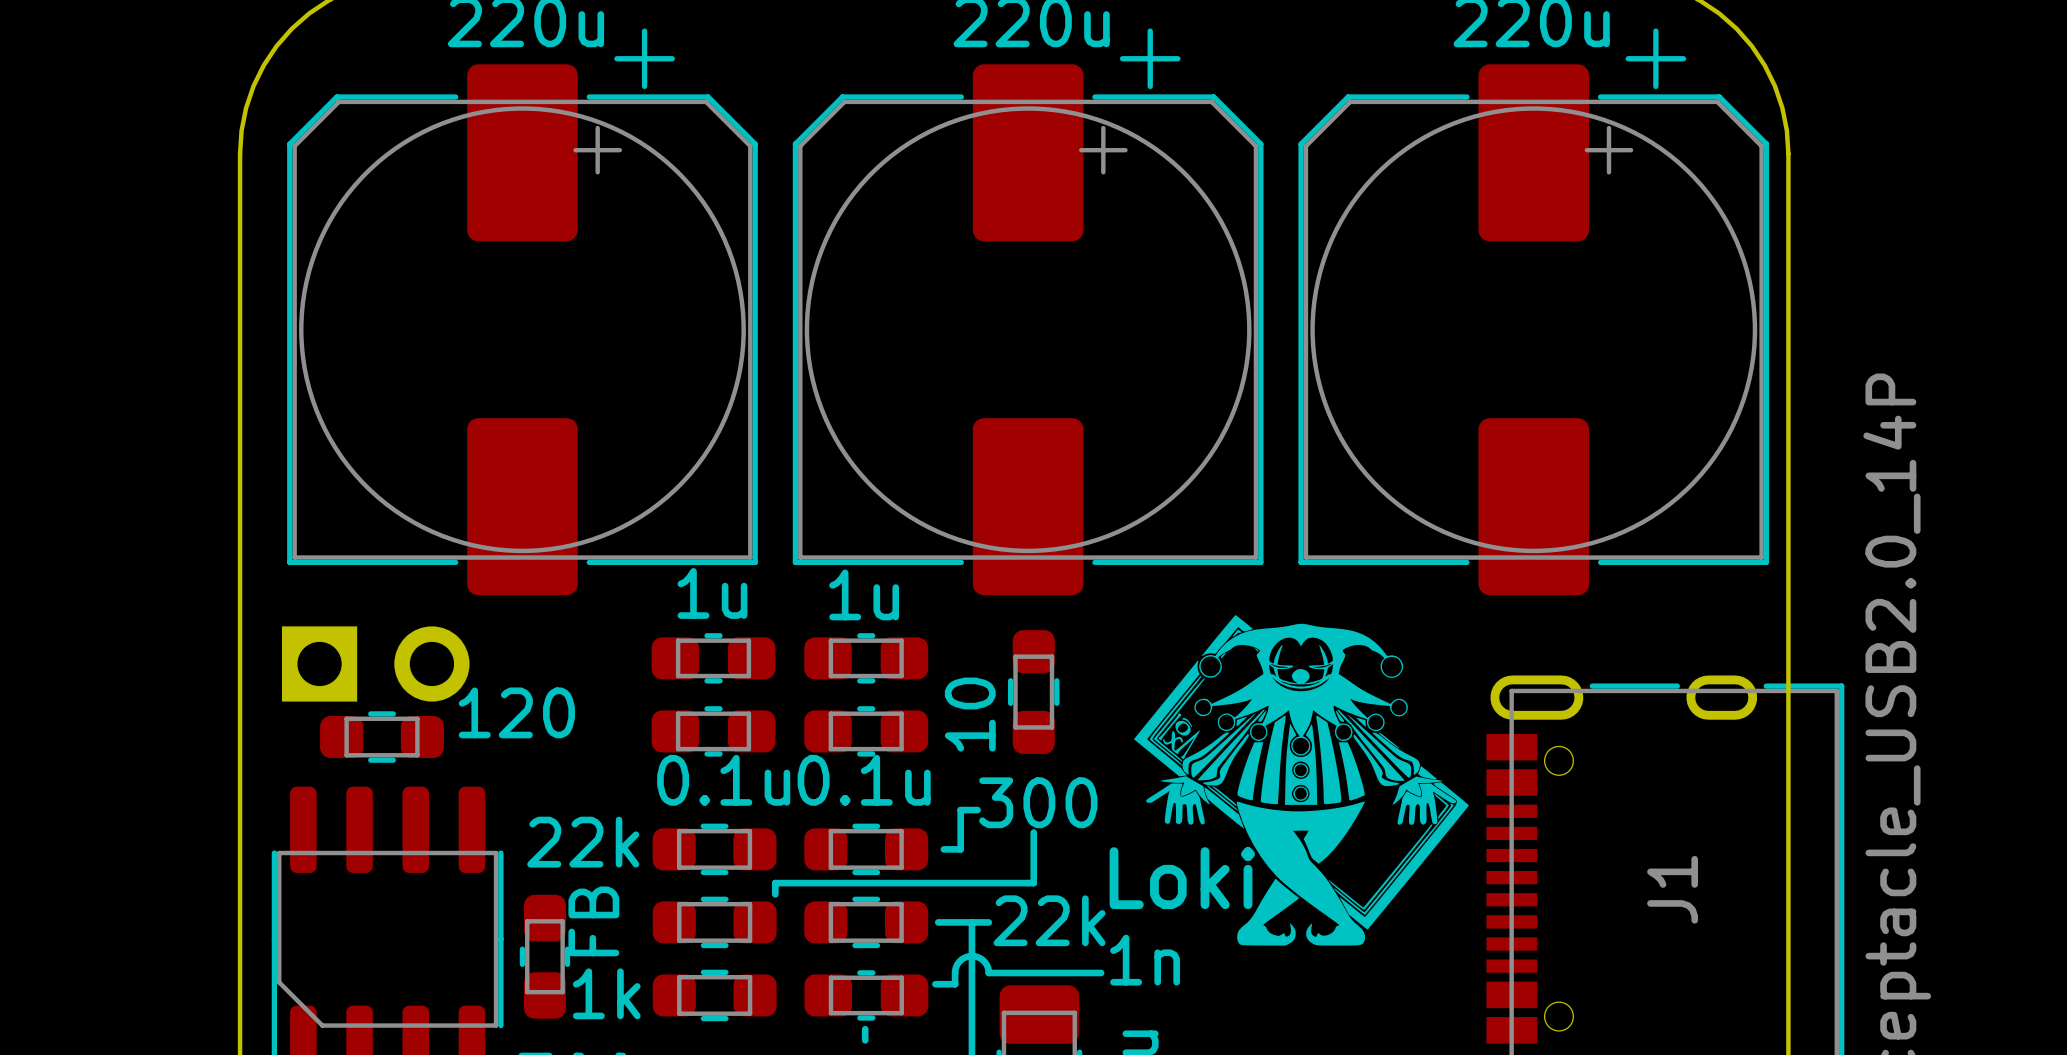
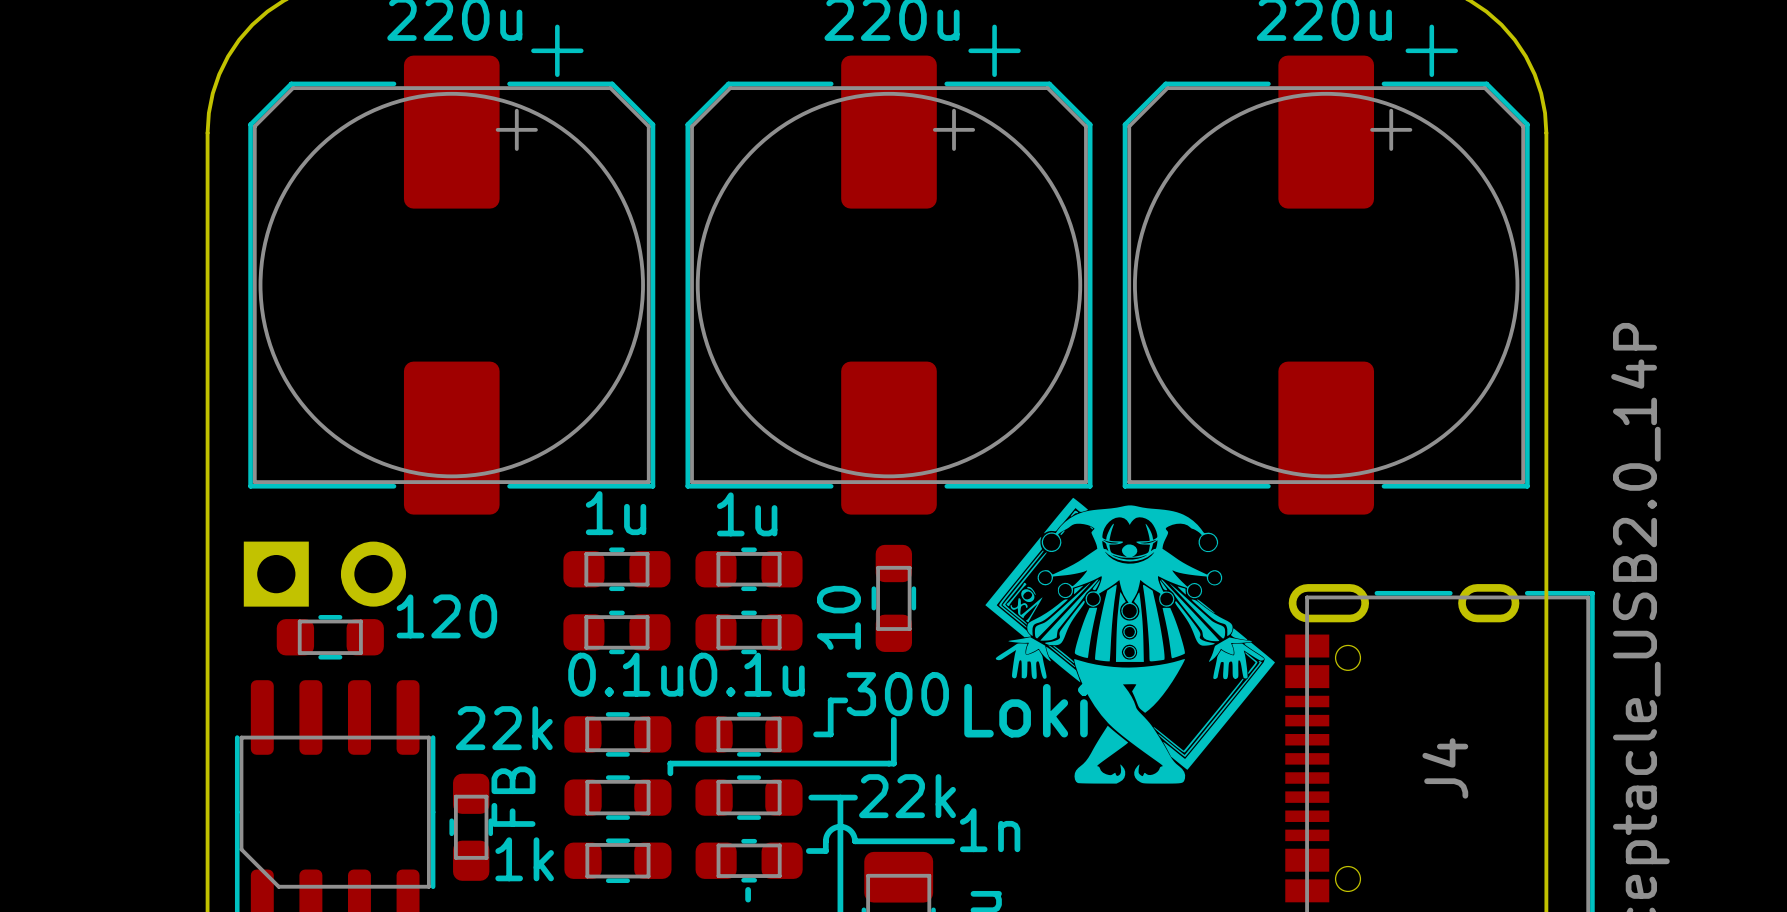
drawing position: (1301, 780) -> (1130, 640)
text position: Loki (1182, 878) -> Loki (1027, 710)
J1 name: J1 (1672, 889) -> J4 (1445, 768)

